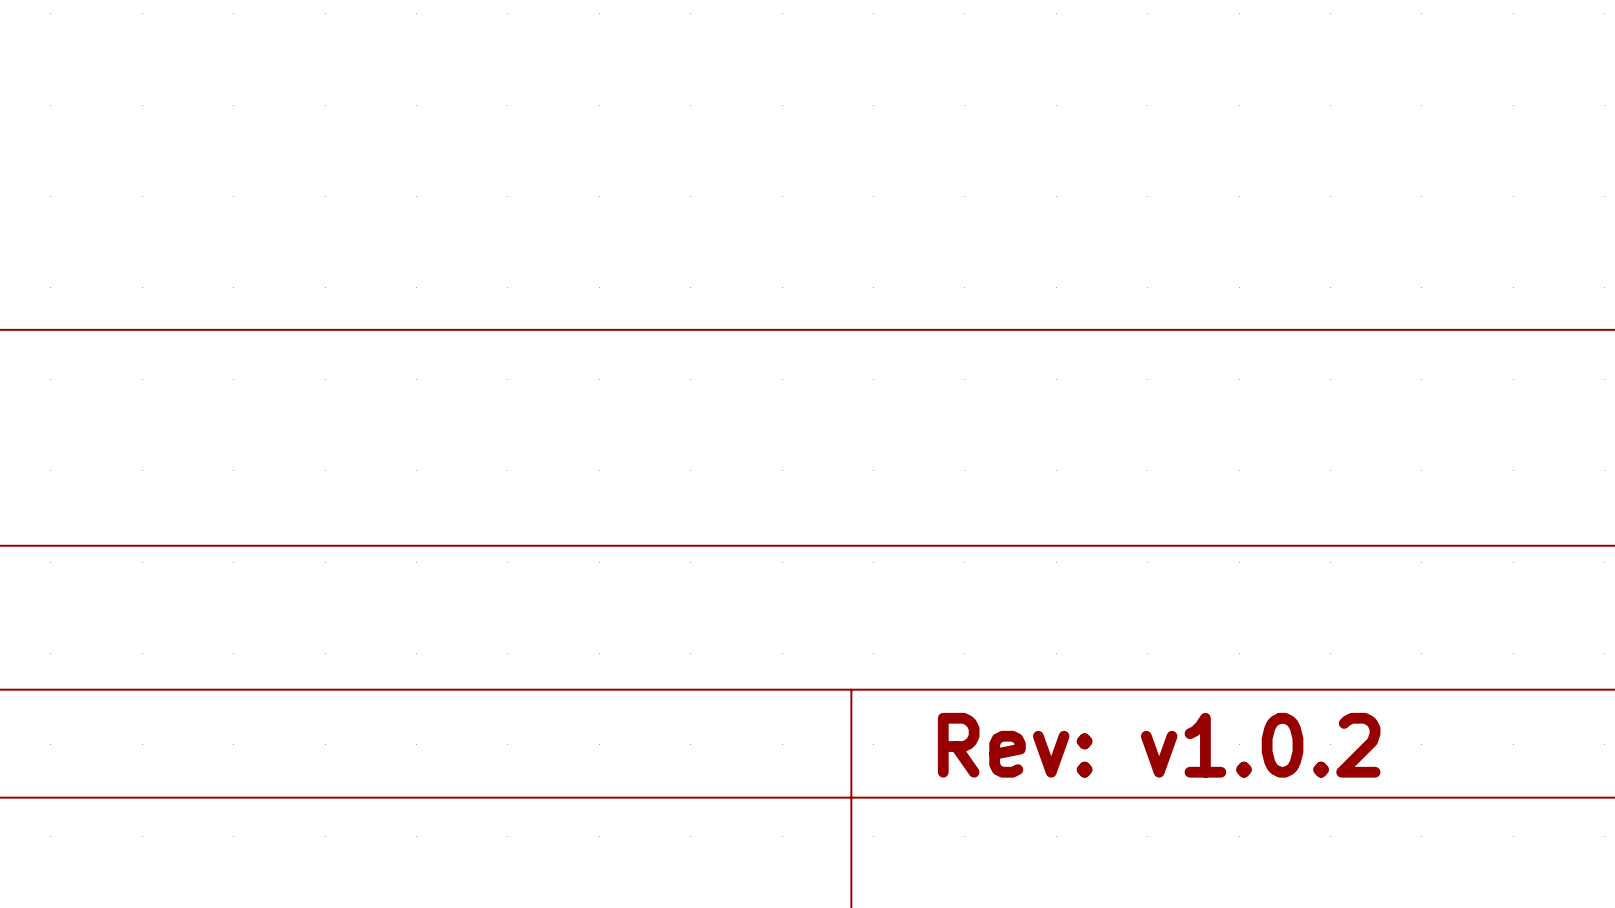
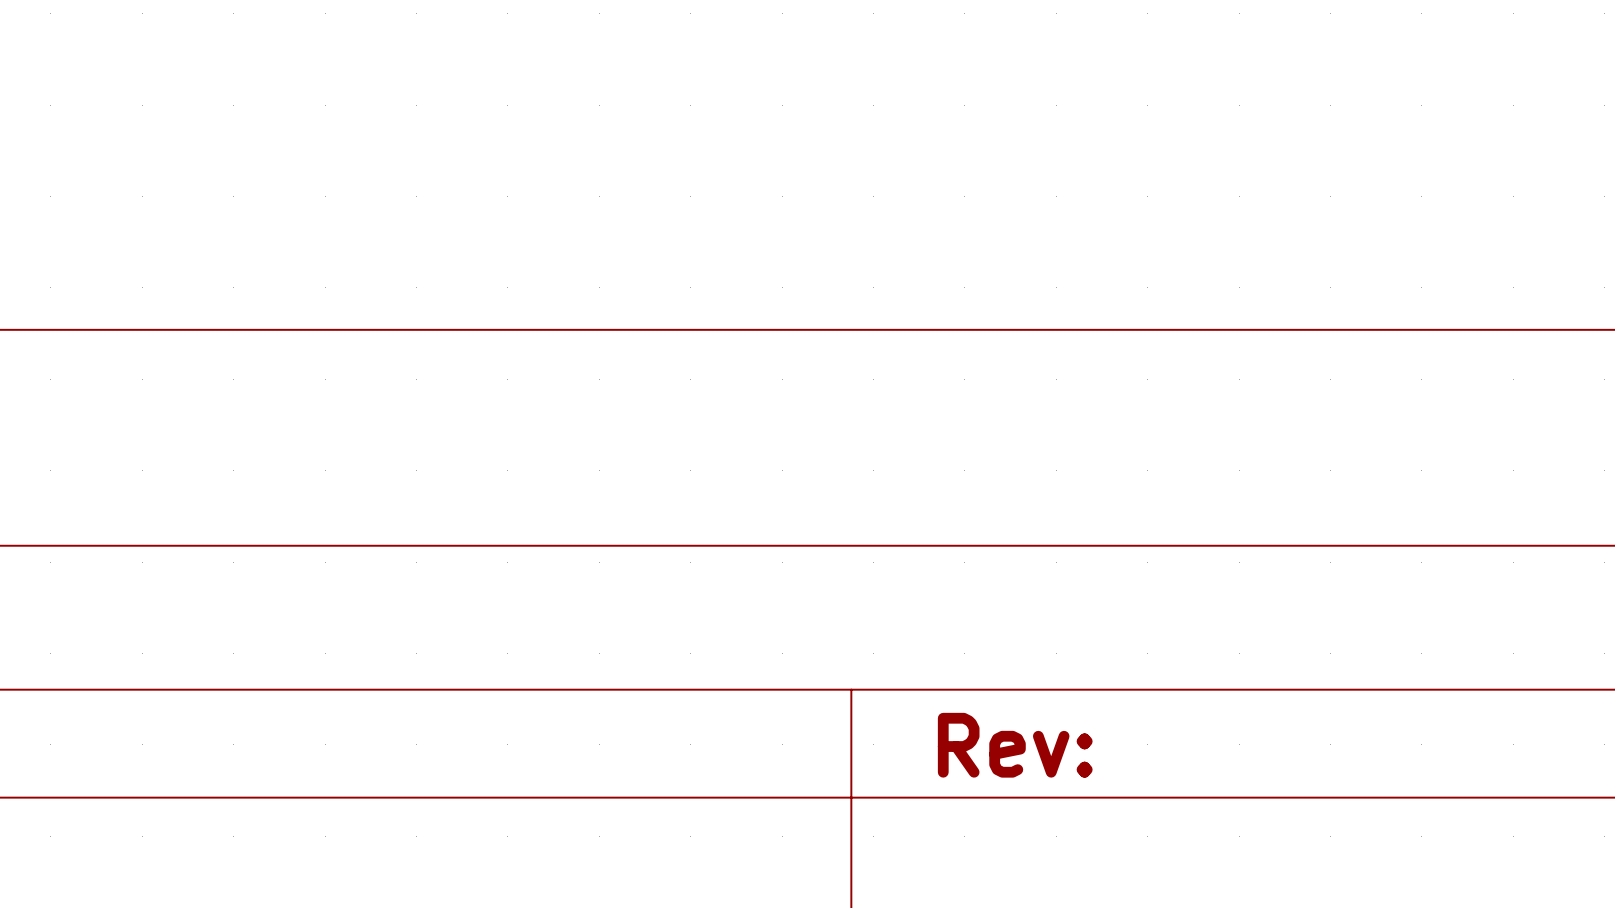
title block: Rev: v1.0.2 (1159, 745) -> Rev: (1015, 745)

